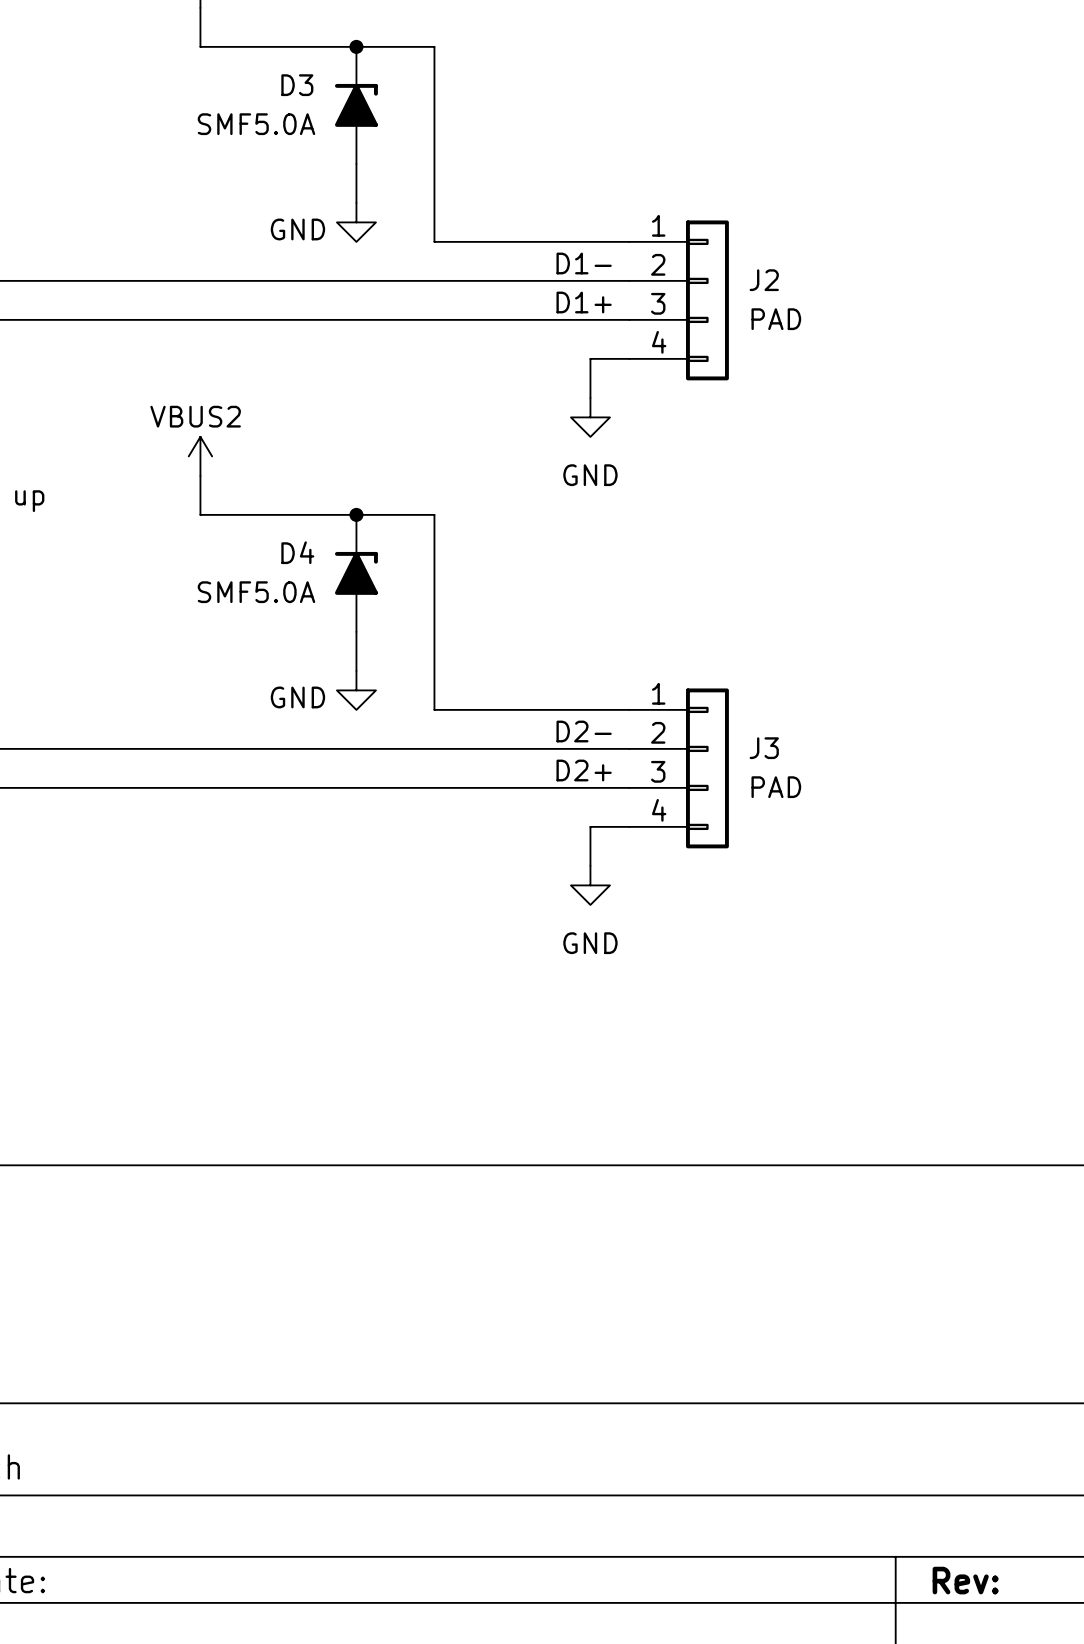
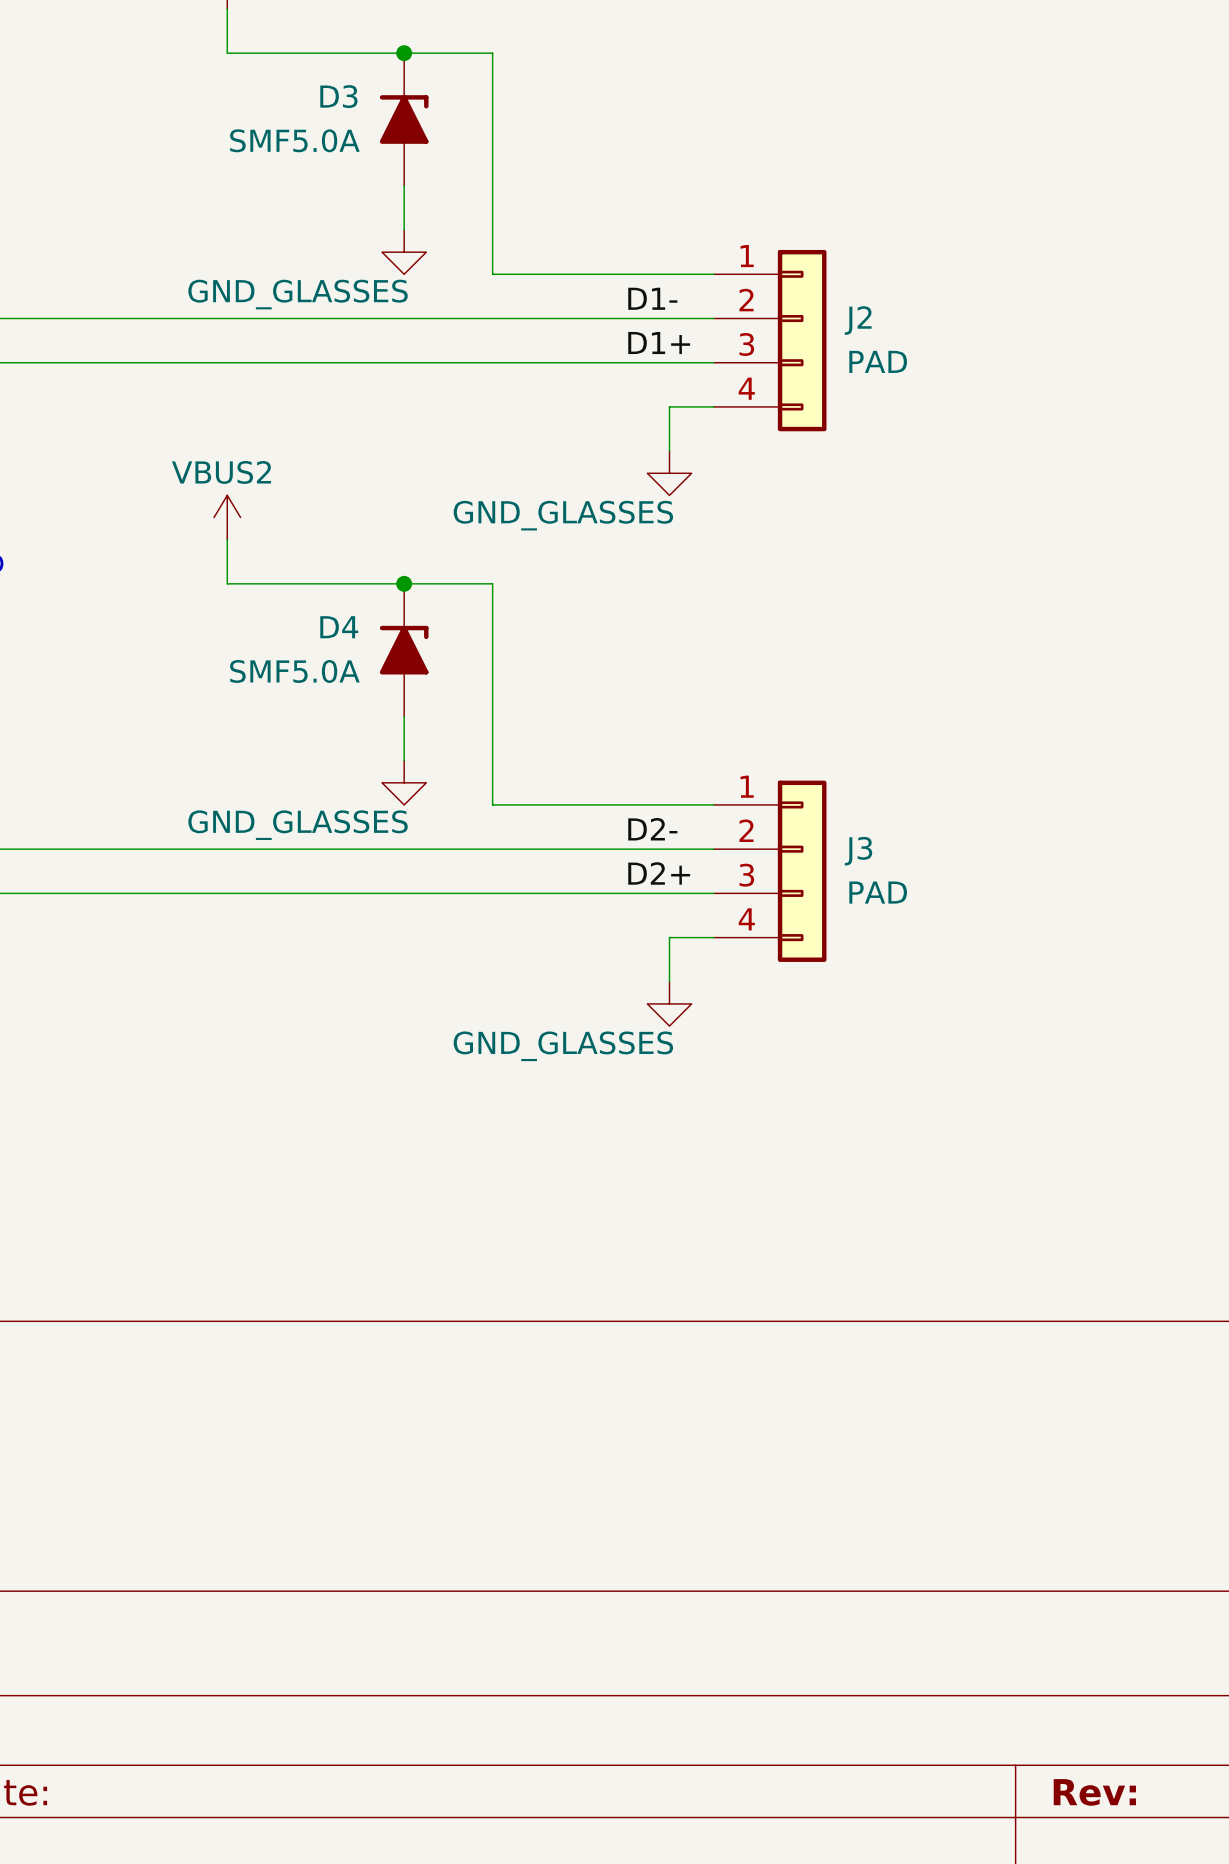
power symbol: GND (356, 222) -> GND_GLASSES (404, 252)
power symbol: GND (590, 417) -> GND_GLASSES (669, 473)
power symbol: GND (356, 690) -> GND_GLASSES (404, 782)
power symbol: GND (590, 885) -> GND_GLASSES (669, 1003)

